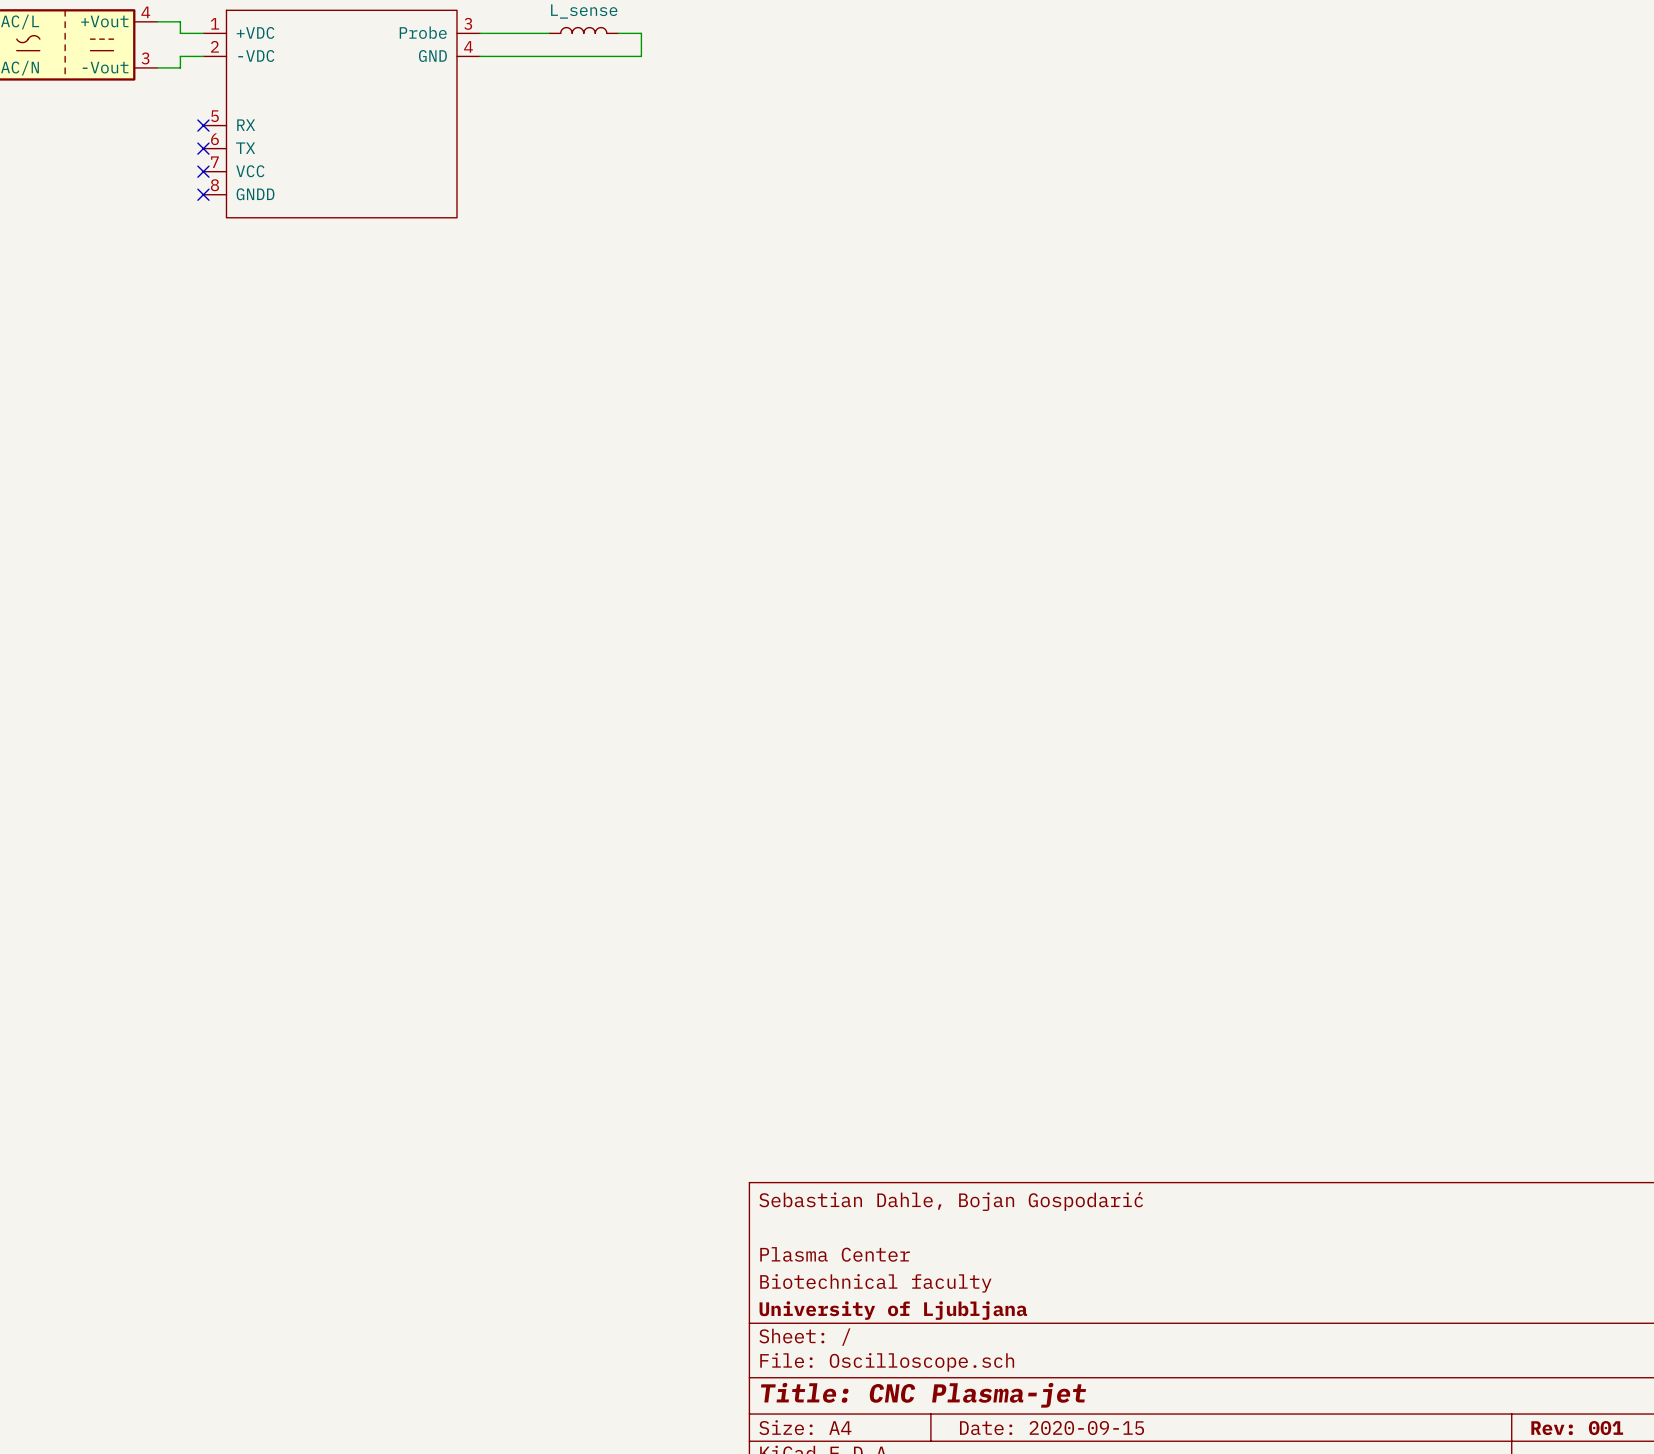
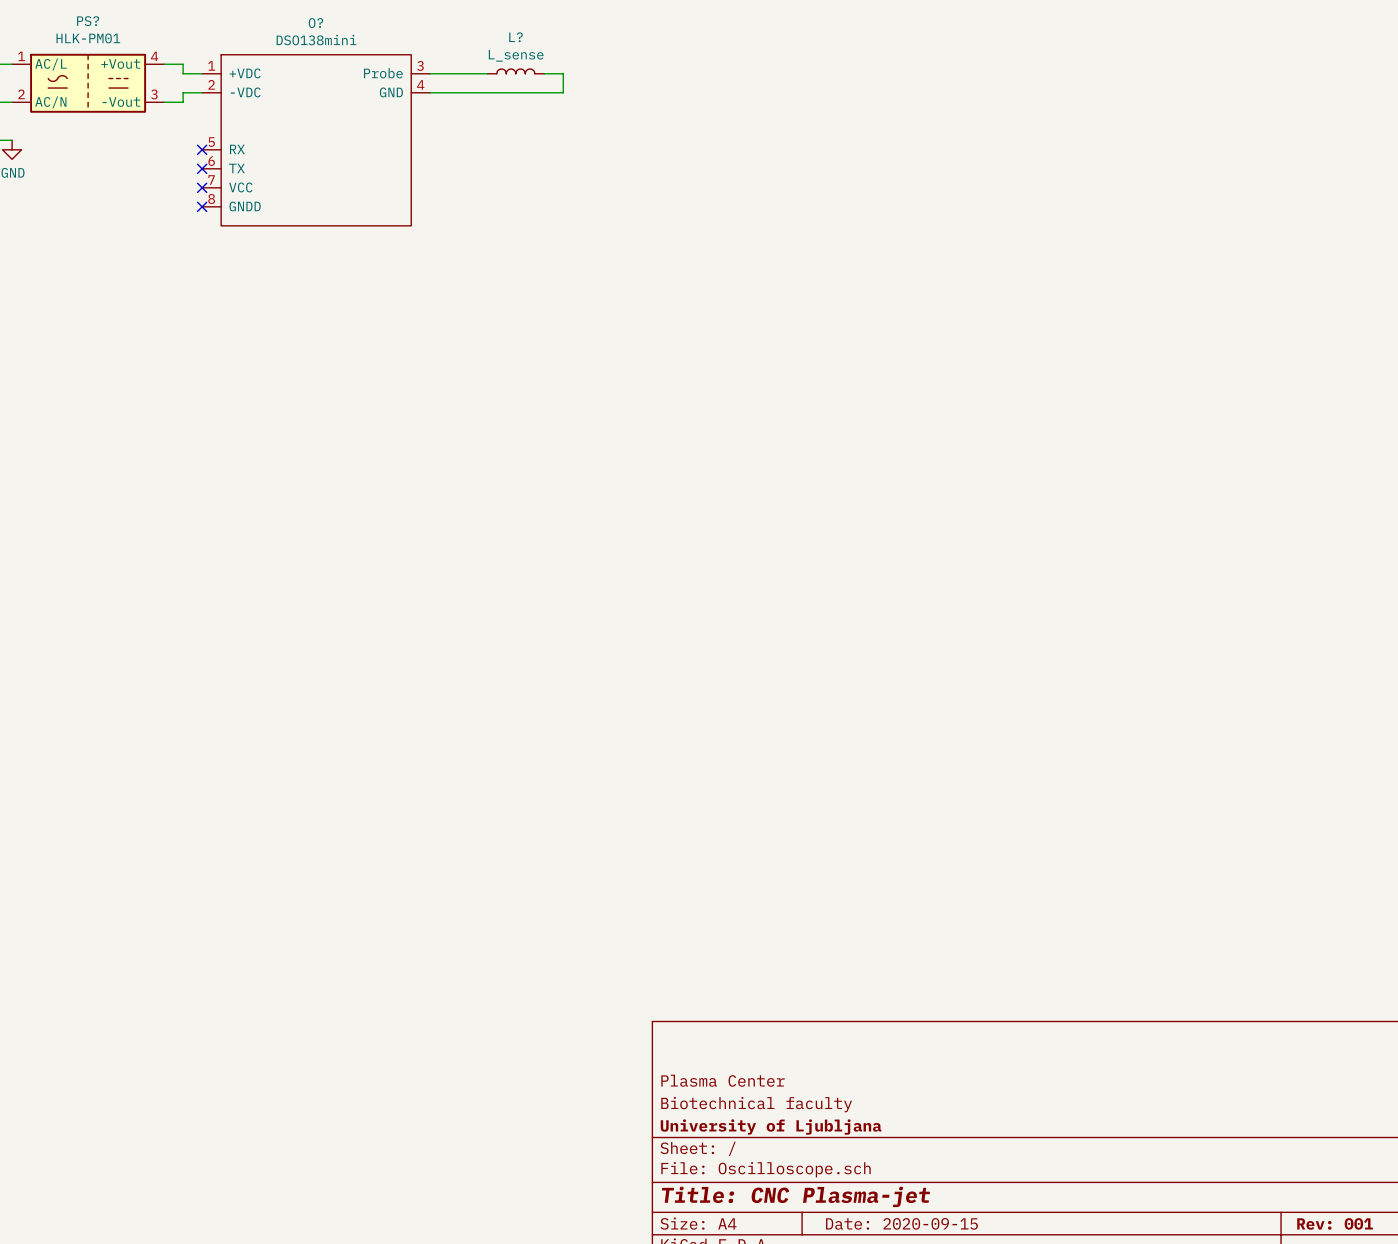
title block: Sebastian Dahle, Bojan Gospodarić (951, 1201) -> none

